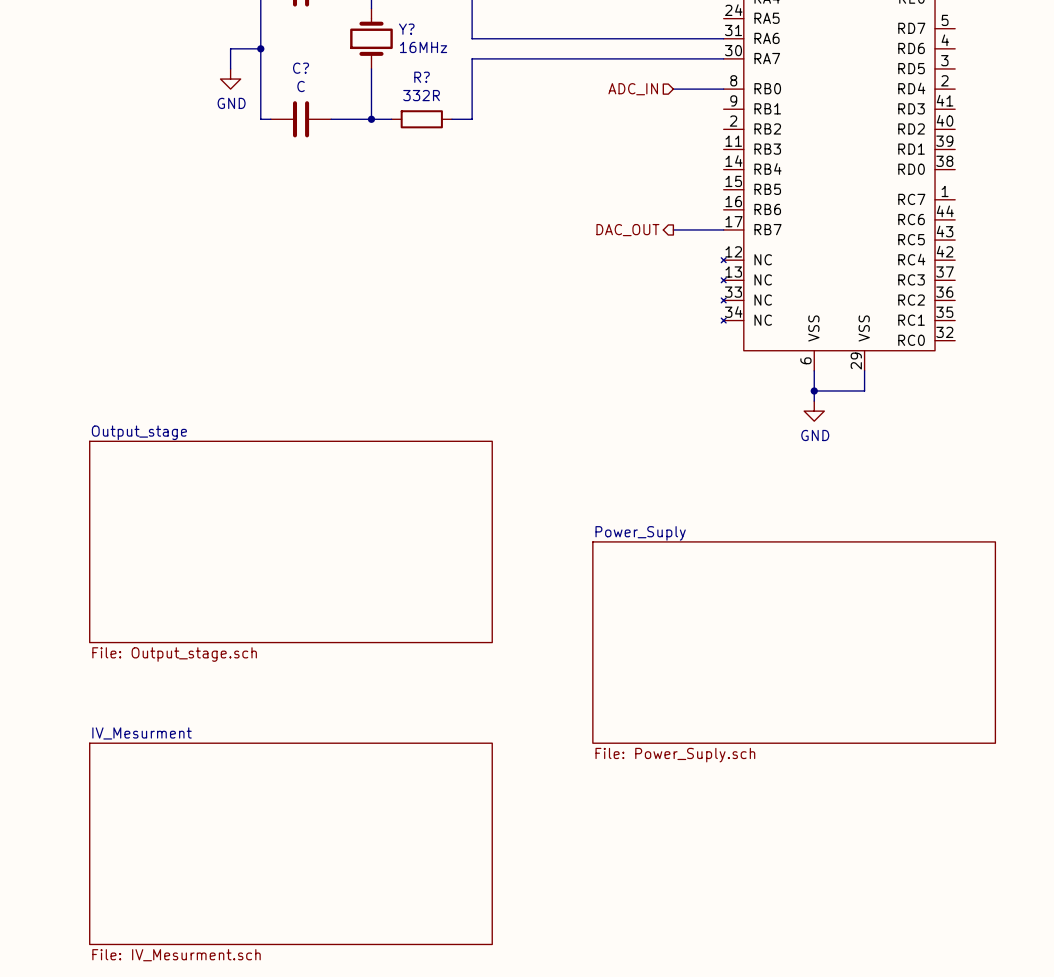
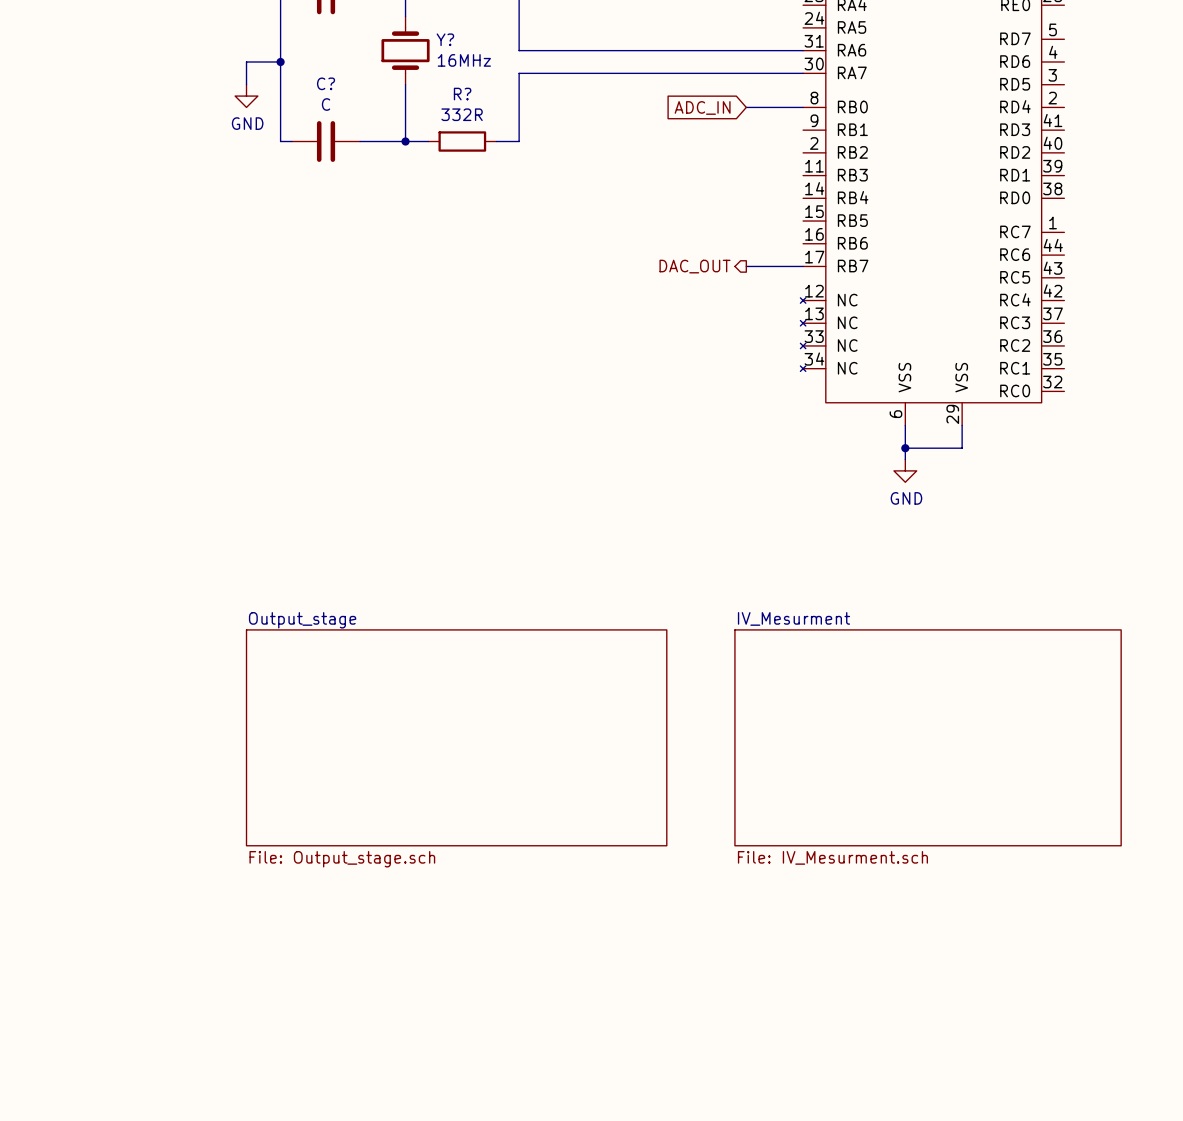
hierarchical label: ADC_IN (633, 89) -> none
global label: none -> ADC_IN (702, 107)
sheet Output_stage: File: Output_stage.sch (290, 541) -> none
sheet Power_Suply: File: Power_Suply.sch (794, 642) -> none
sheet Output_stage: none -> File: Output_stage.sch (456, 737)
sheet IV_Mesurment: none -> File: IV_Mesurment.sch (928, 737)
sheet IV_Mesurment: File: IV_Mesurment.sch (290, 843) -> none

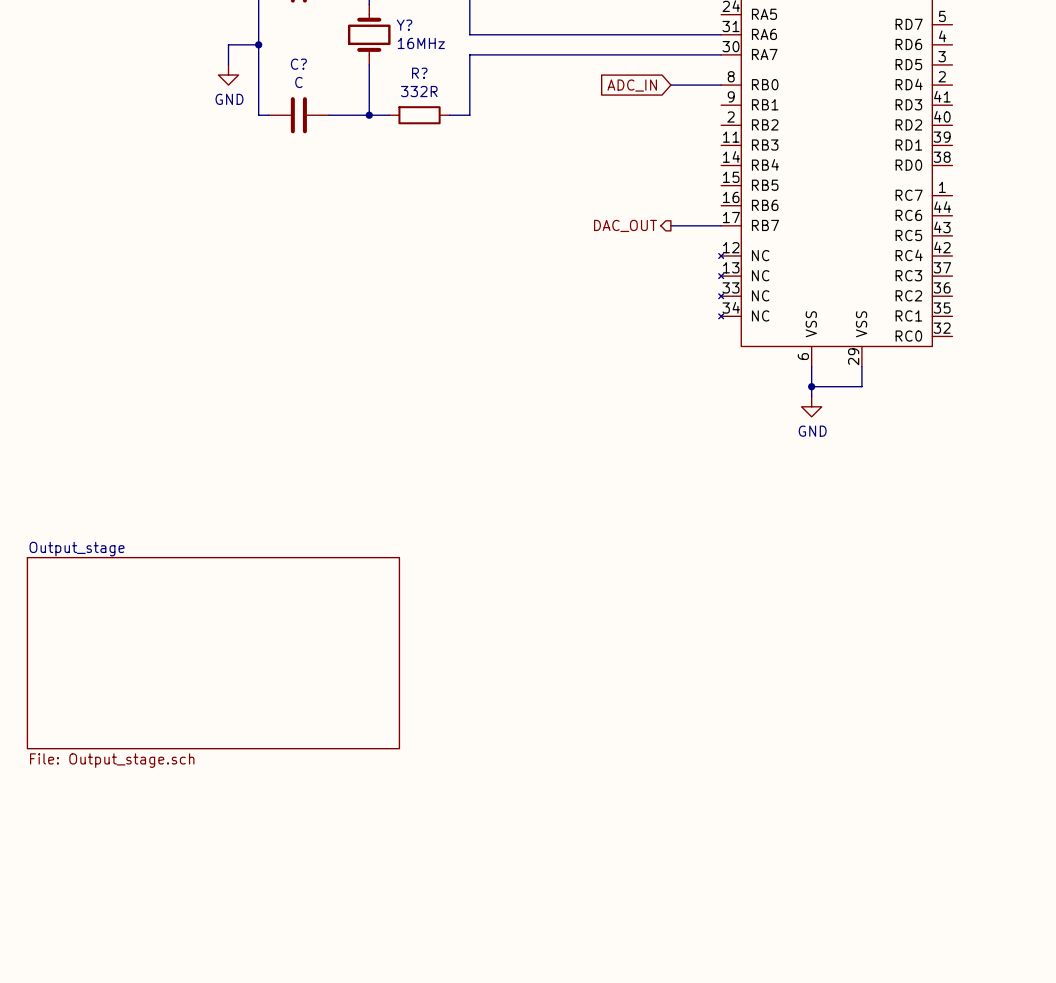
sheet Output_stage: File: Output_stage.sch (456, 737) -> none
sheet IV_Mesurment: File: IV_Mesurment.sch (928, 737) -> none
sheet Output_stage: none -> File: Output_stage.sch (213, 653)

